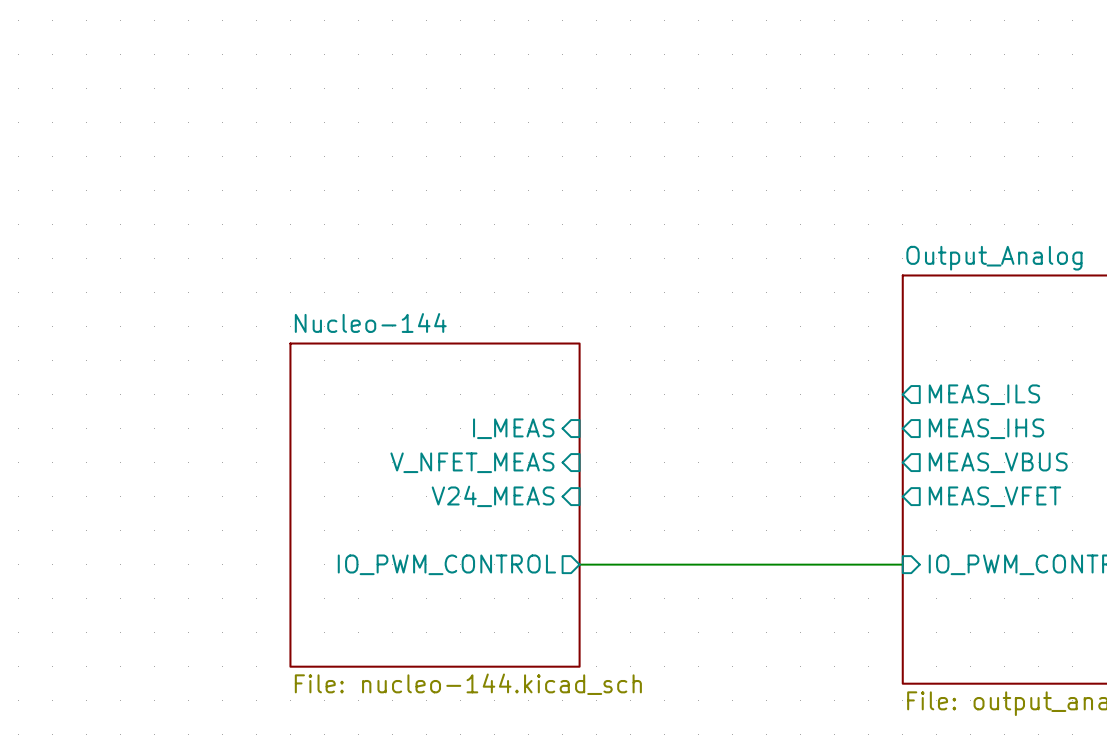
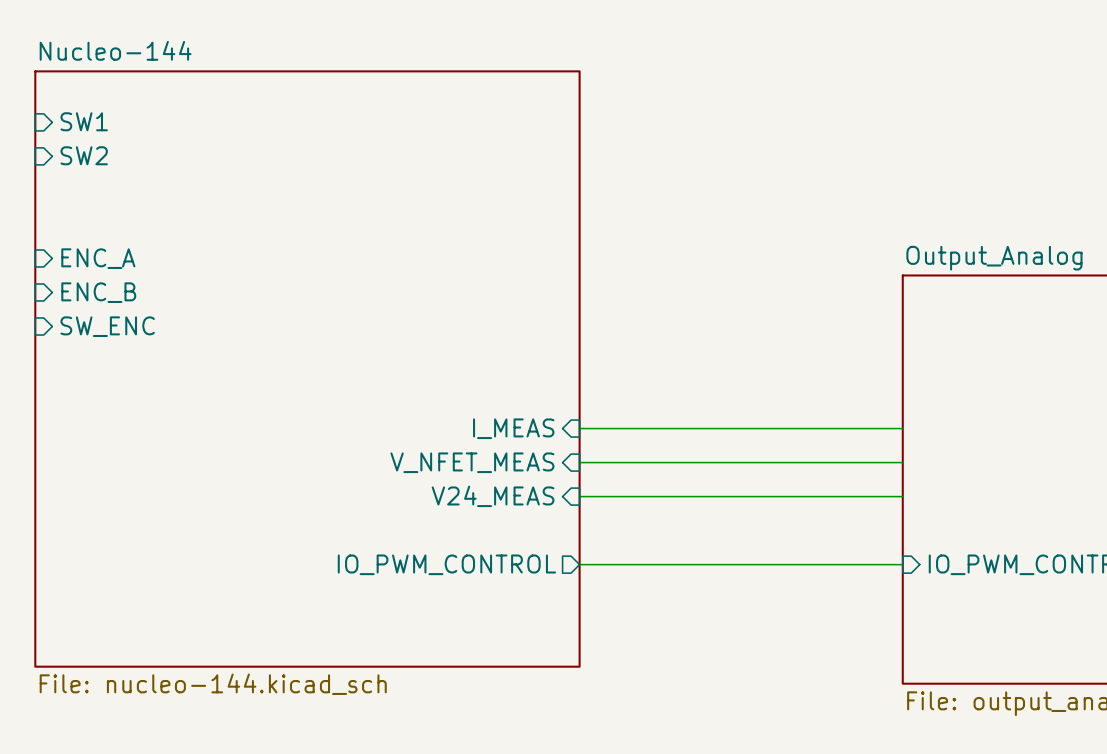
sheet pin: none -> SW1 (84, 121)
sheet pin: none -> SW2 (84, 155)
sheet pin: none -> ENC_A (98, 258)
sheet pin: none -> ENC_B (98, 292)
sheet Nucleo-144 name position: Nucleo-144 (370, 322) -> Nucleo-144 (115, 50)
sheet pin: none -> SW_ENC (107, 326)
sheet Nucleo-144 shape: [289, 342, 581, 668] -> [34, 70, 581, 668]
sheet pin: MEAS_ILS (984, 394) -> none
wire: none -> (579, 428) (902, 428)
sheet pin: MEAS_IHS (986, 428) -> none
wire: none -> (579, 462) (902, 462)
sheet pin: MEAS_VBUS (998, 462) -> none
wire: none -> (579, 496) (902, 496)
sheet pin: MEAS_VFET (994, 496) -> none
sheet Nucleo-144 value position: File: nucleo-144.kicad_sch (468, 684) -> File: nucleo-144.kicad_sch (213, 684)

